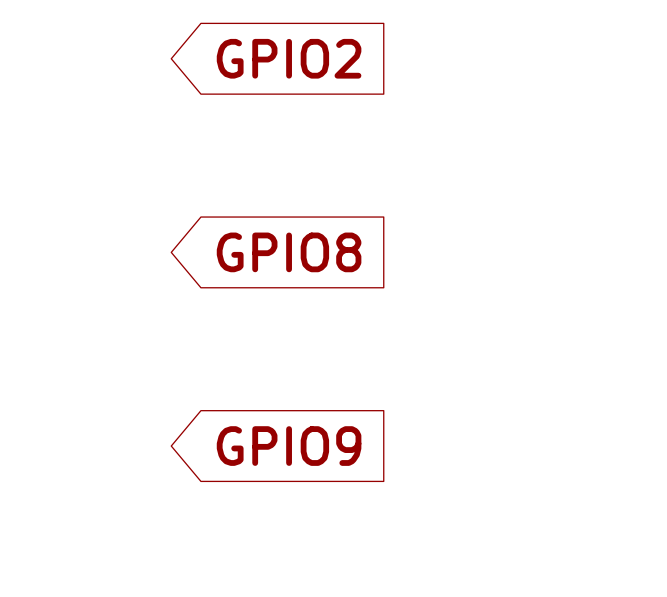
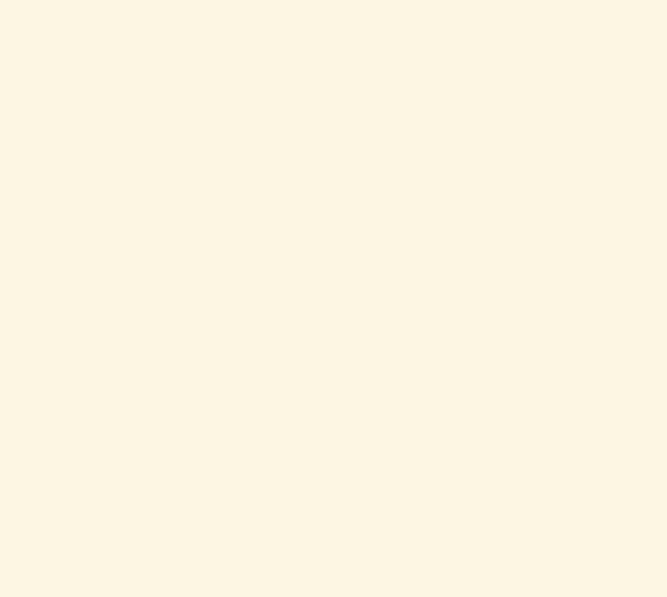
global label: GPIO2 (289, 58) -> none
global label: GPIO8 (289, 252) -> none
global label: GPIO9 (289, 446) -> none

